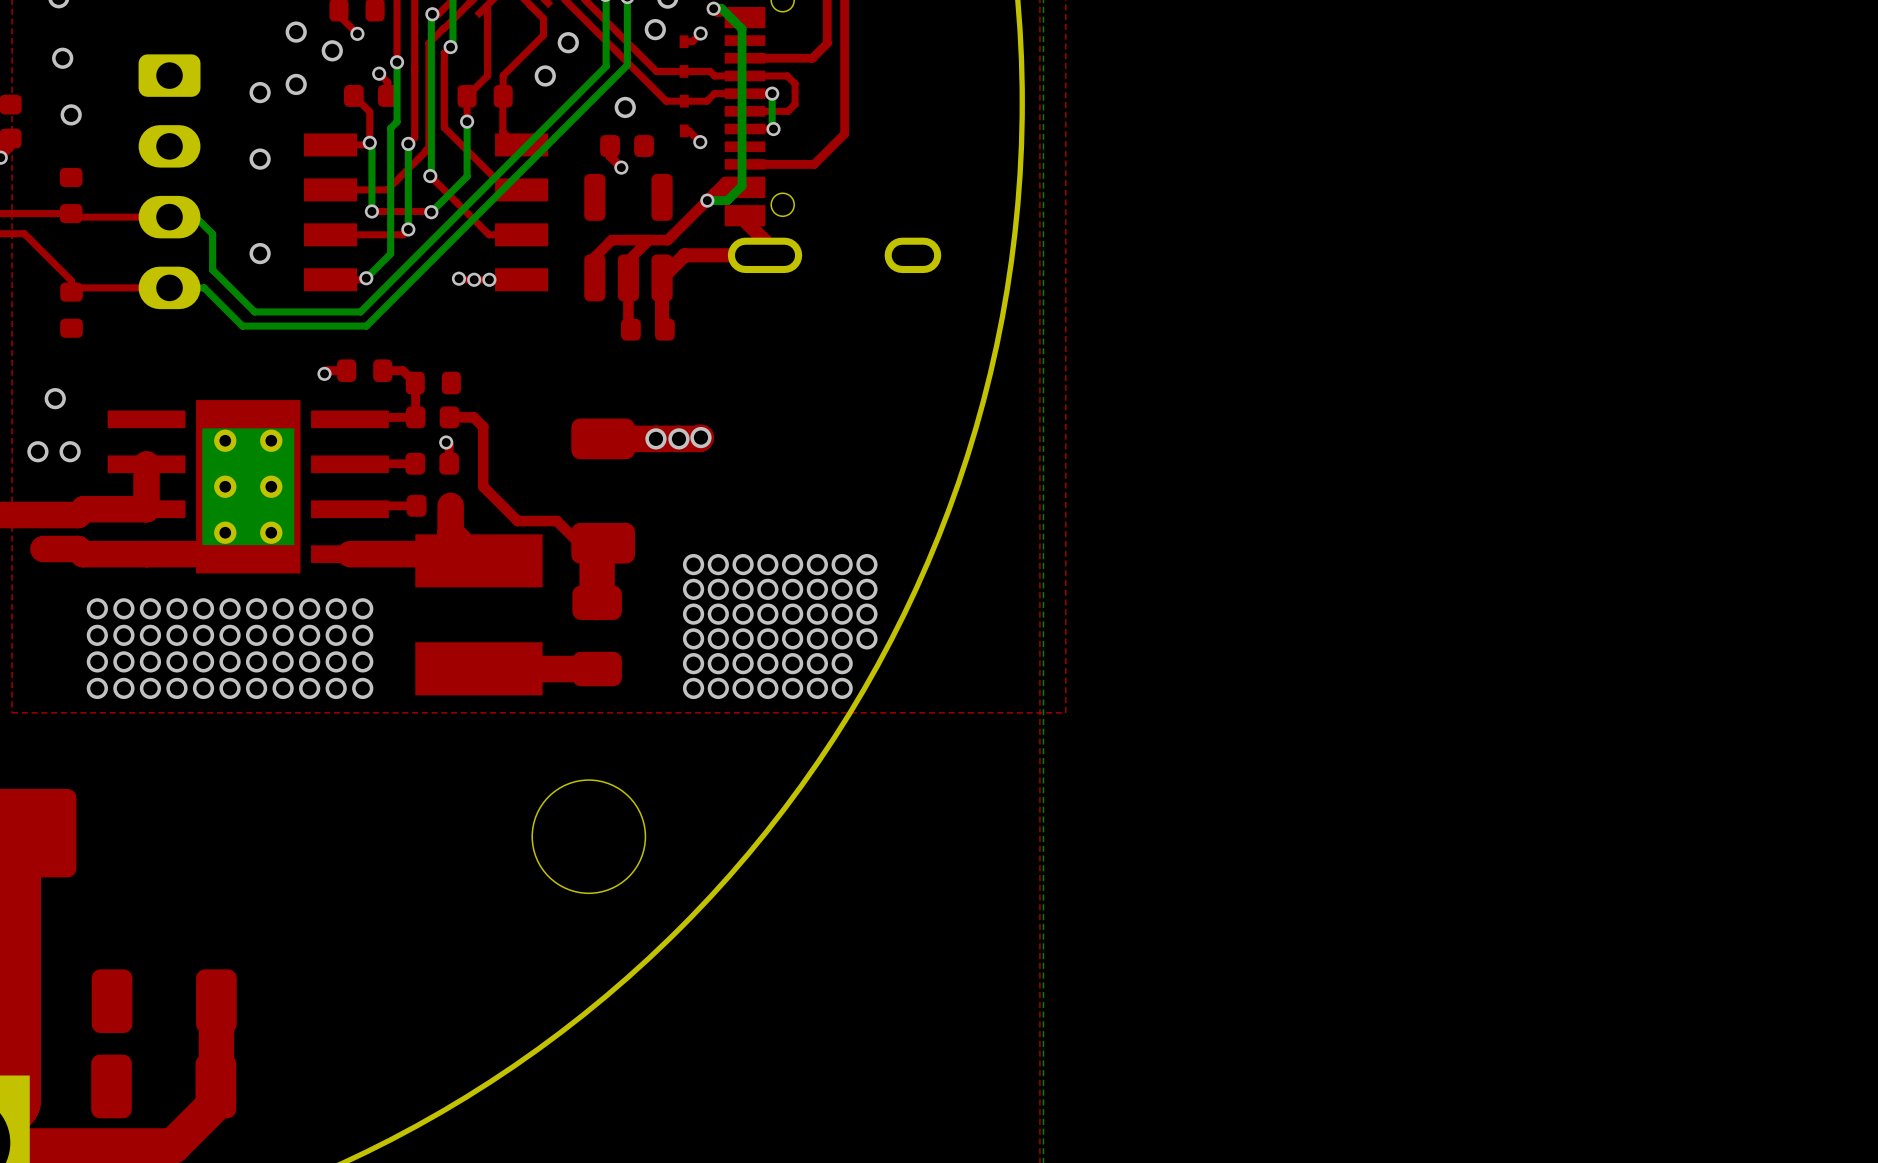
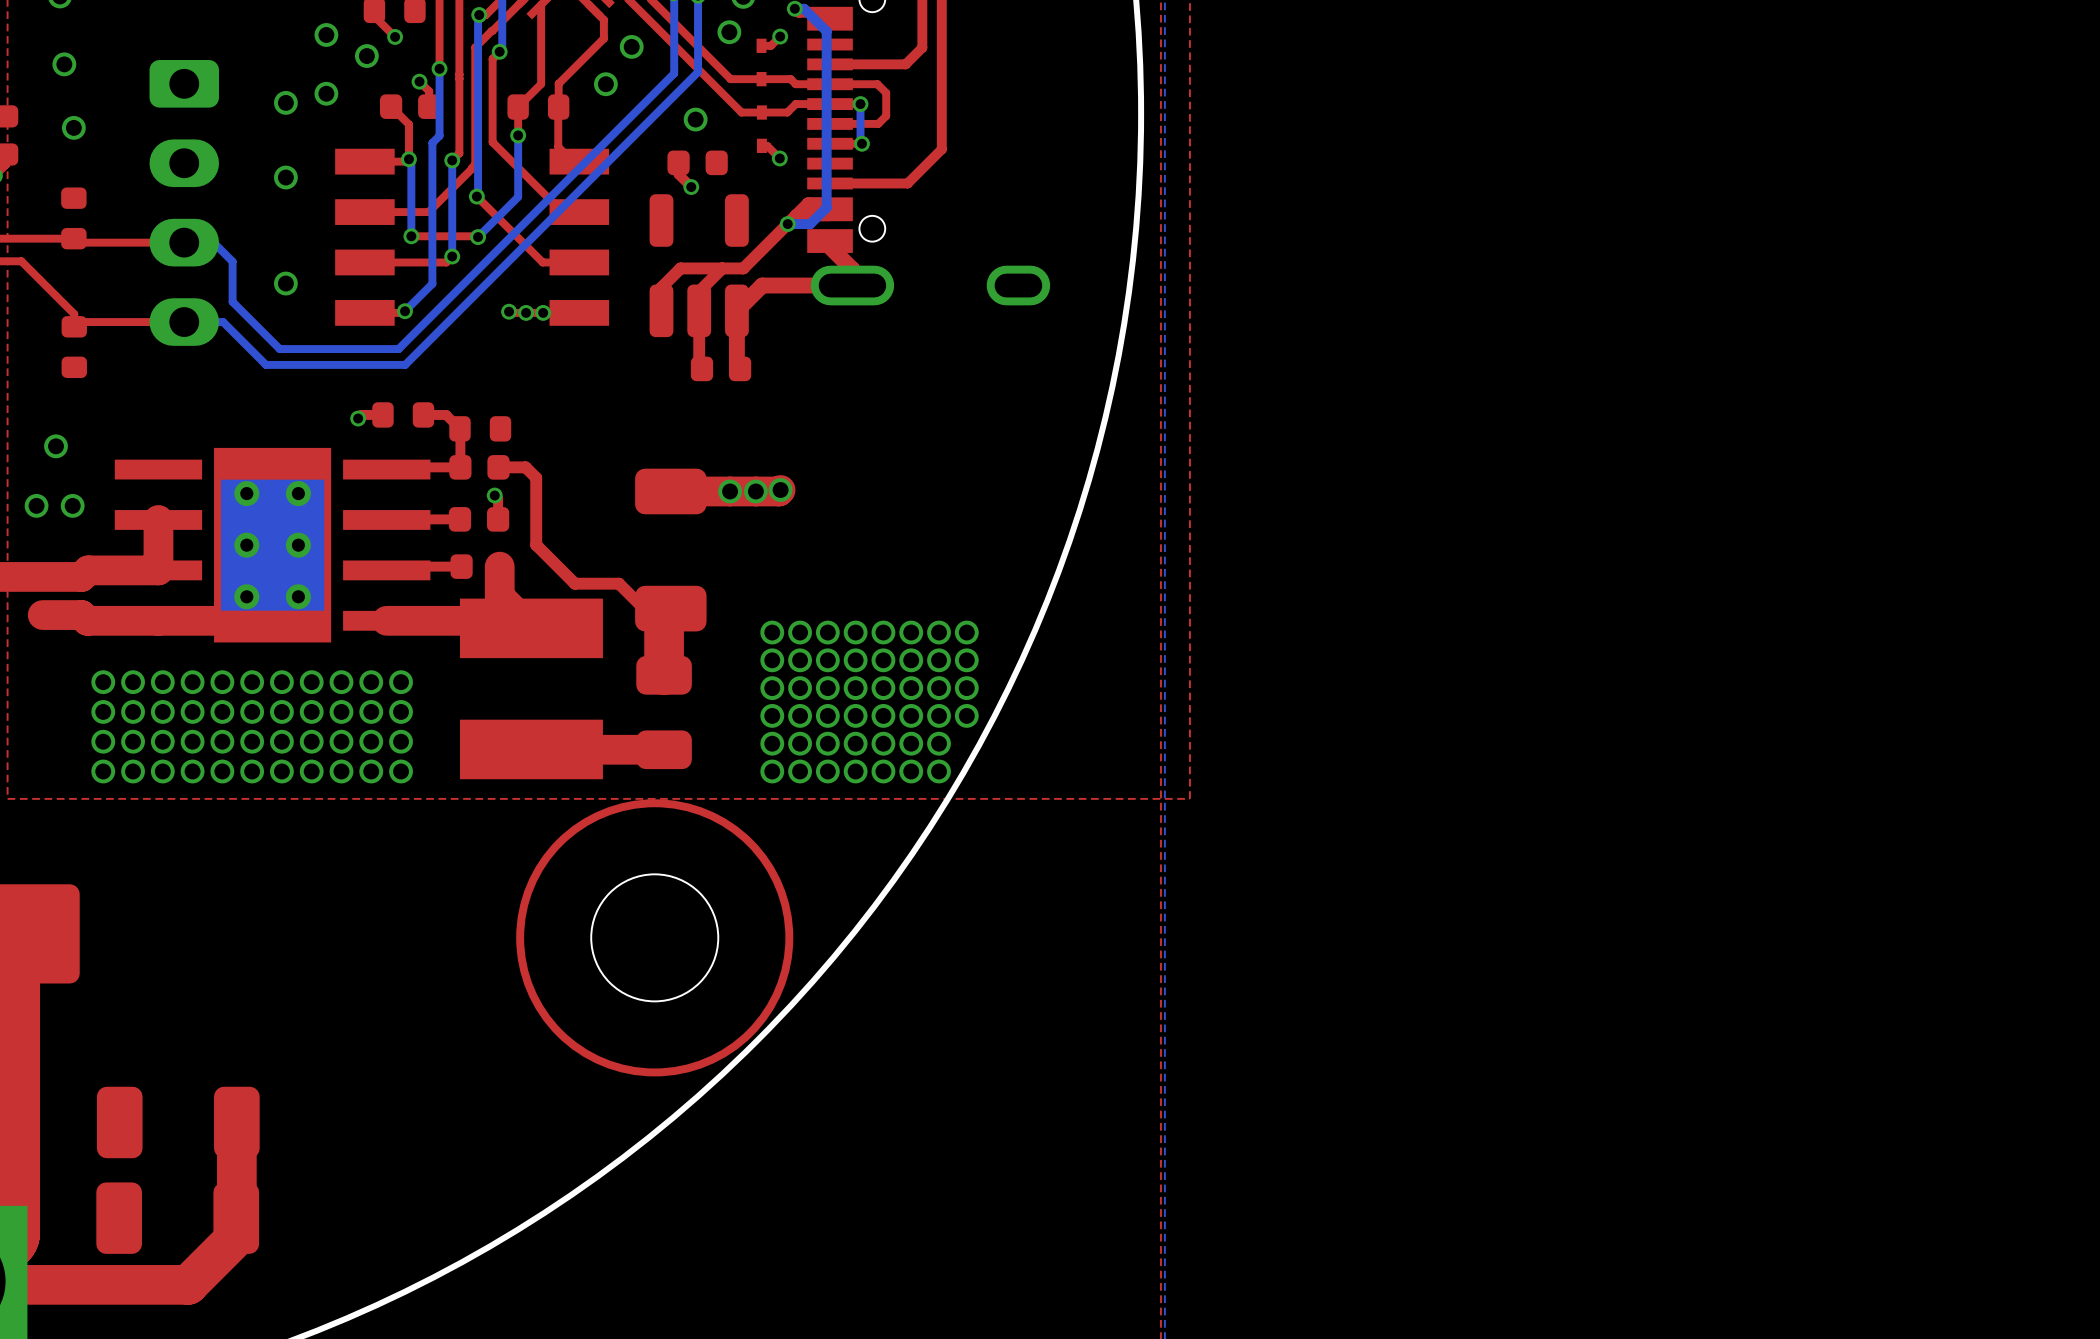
drawing: none -> [516, 799, 794, 1077]

